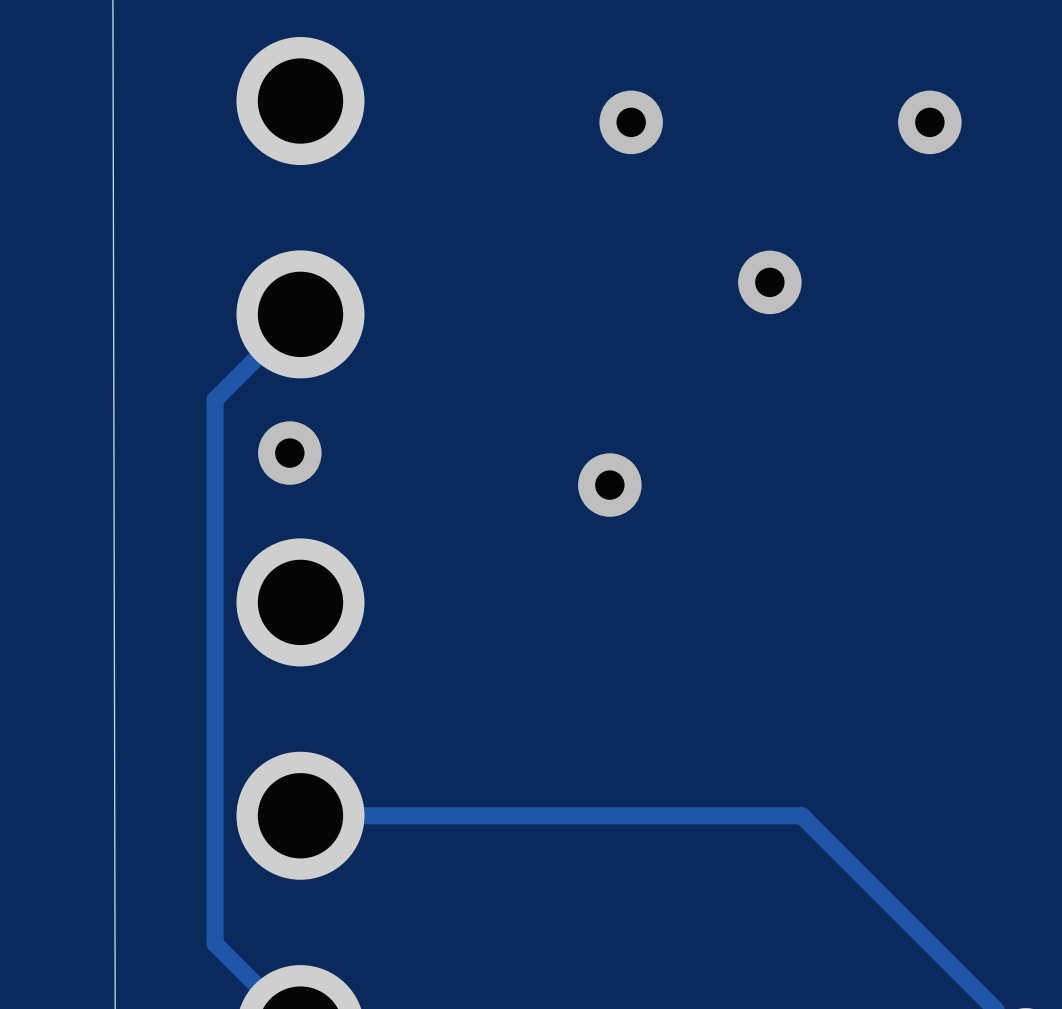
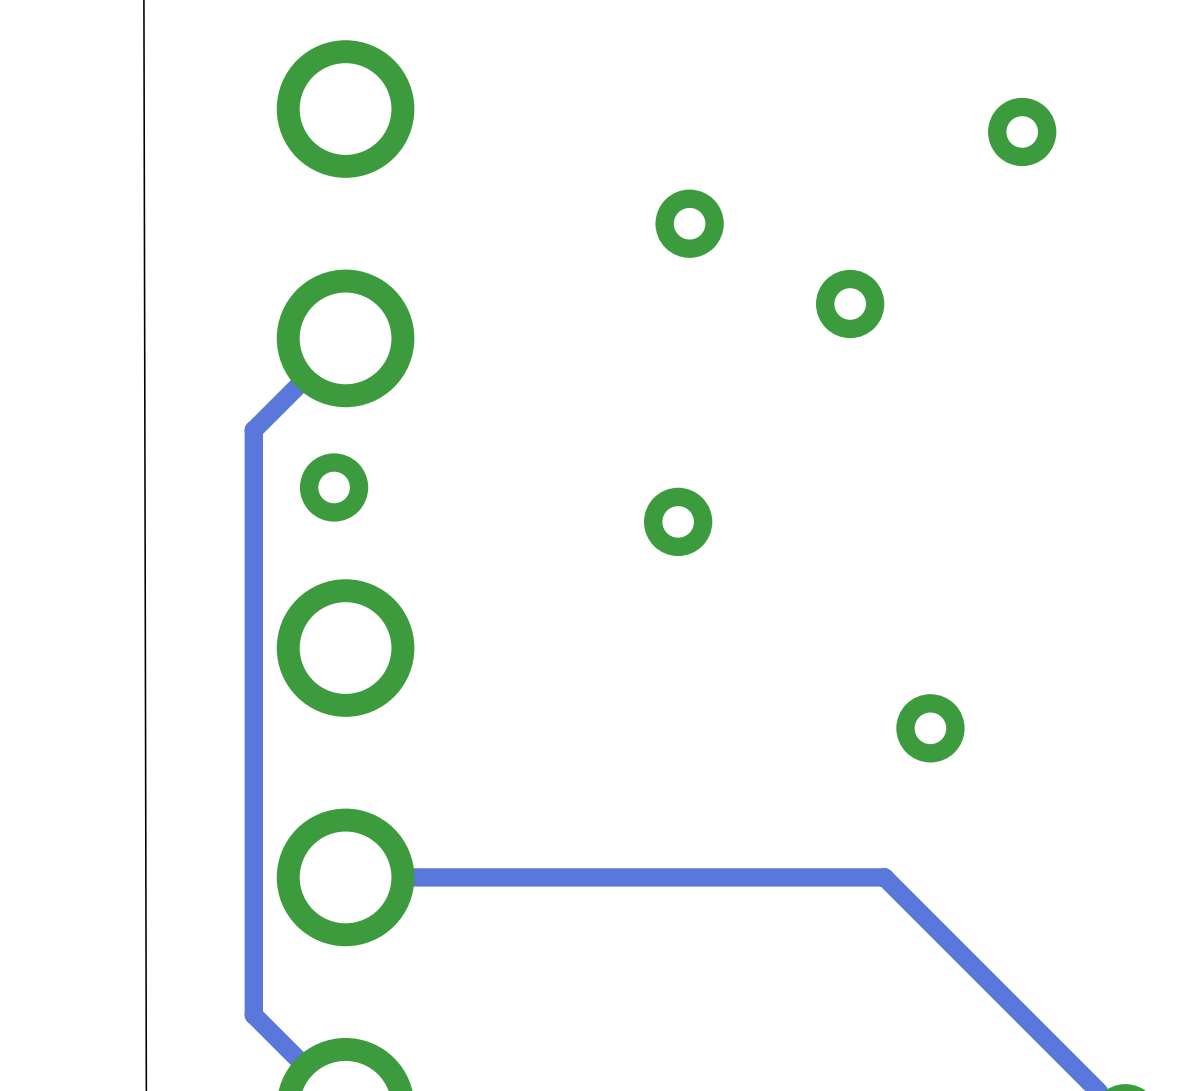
via position: (631, 122) -> (689, 223)
via: none -> (930, 728)

